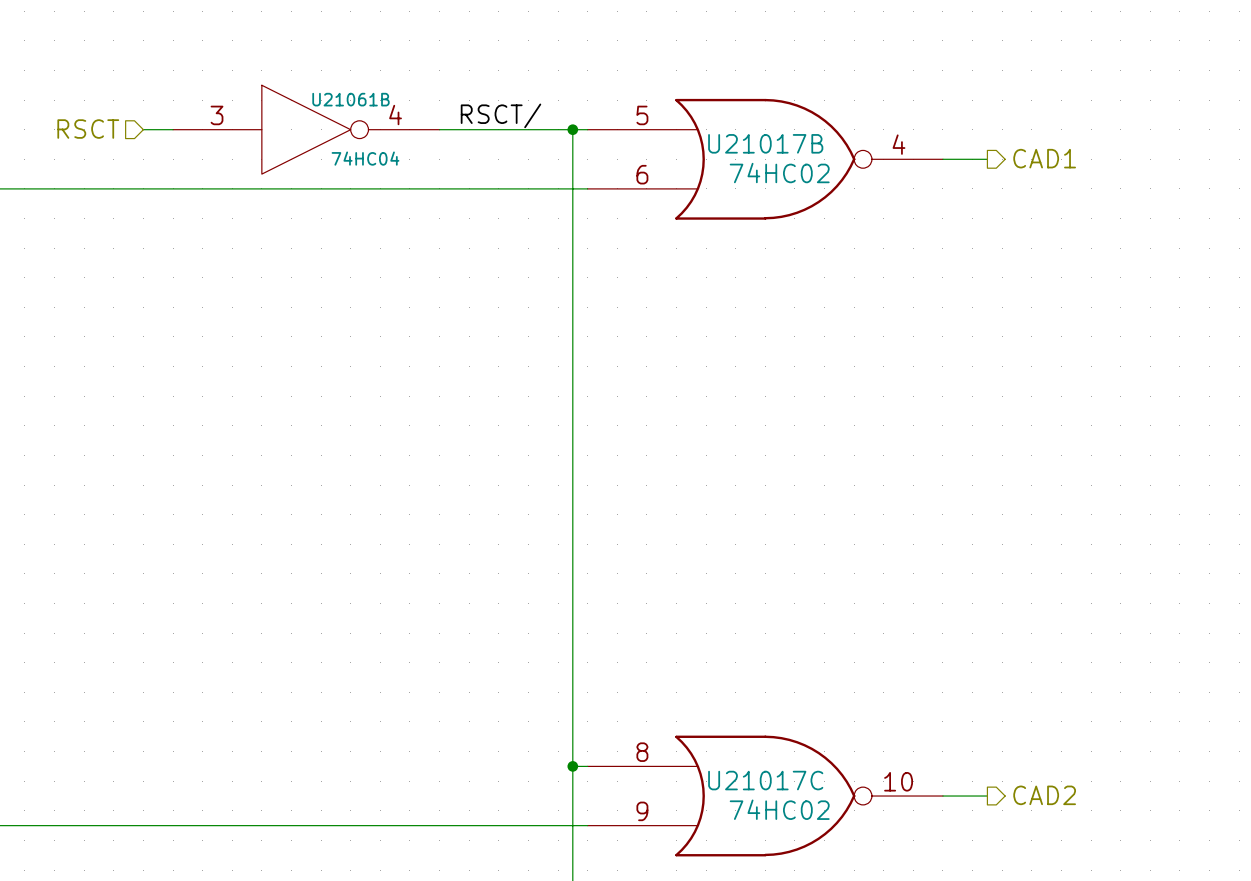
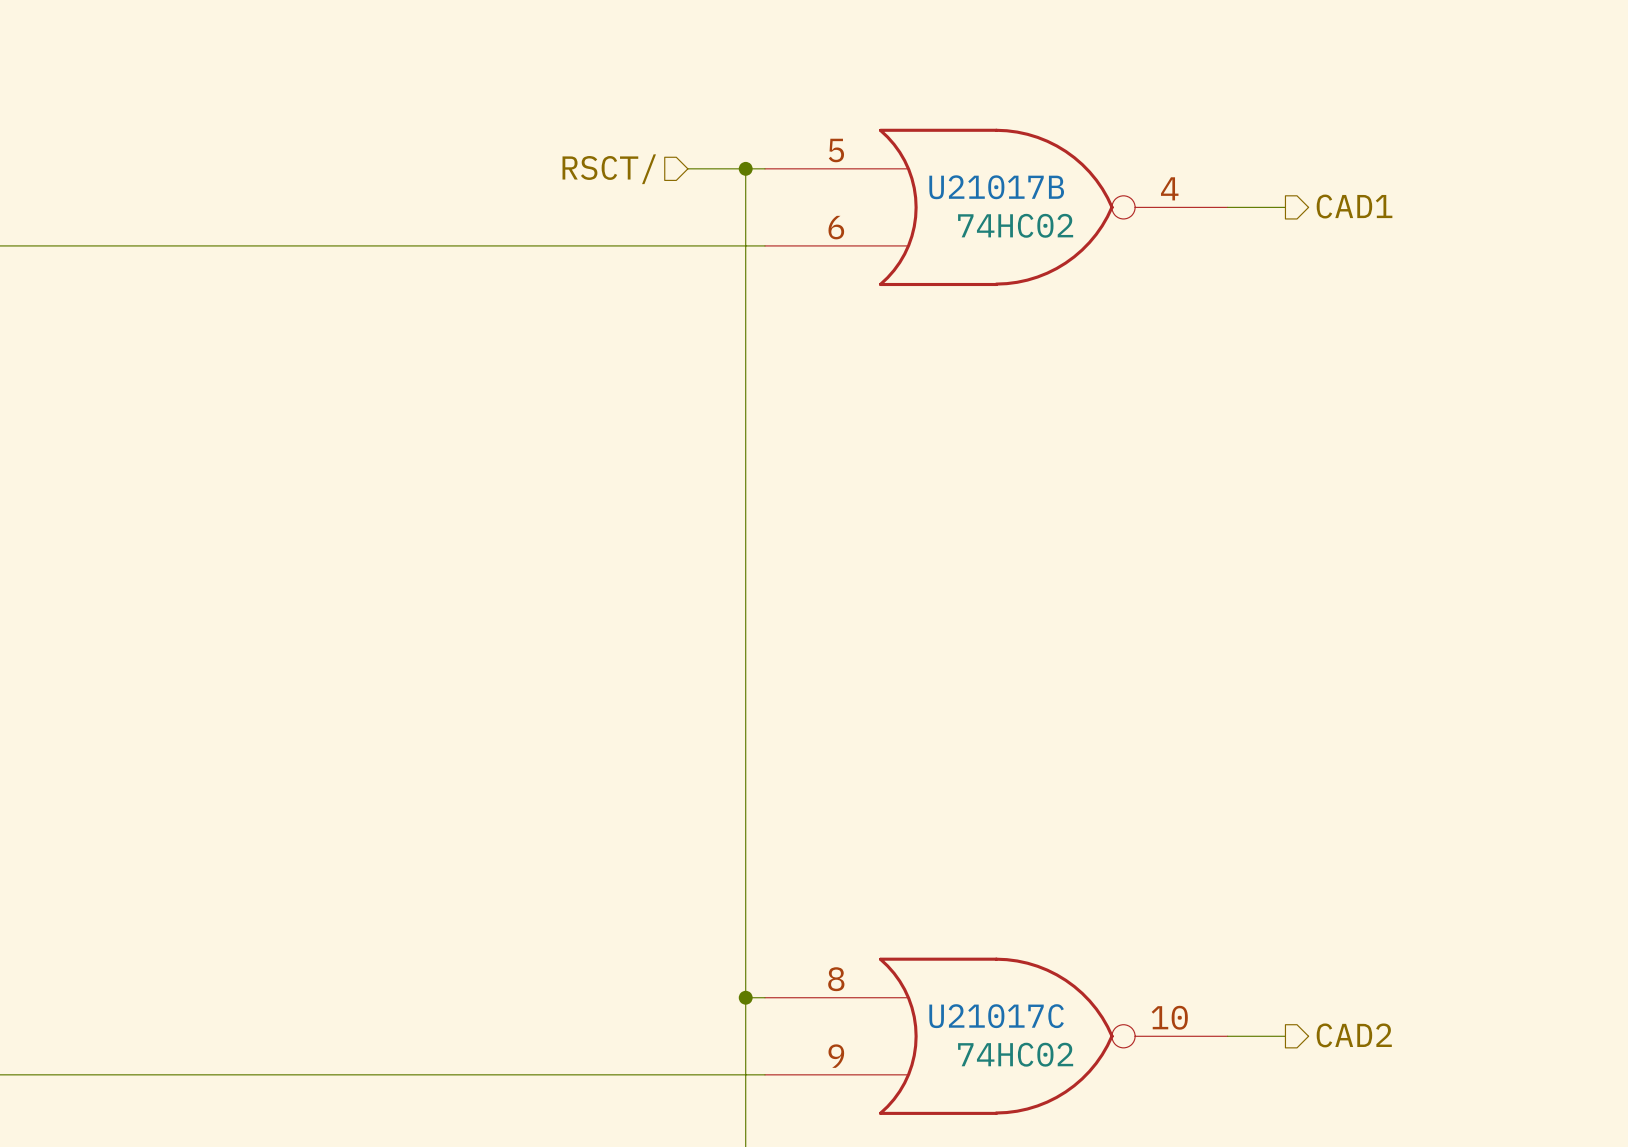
label: RSCT/ (500, 115) -> none
hierarchical label: RSCT (88, 129) -> none
wire: (143, 129) (173, 129) -> none
U21061B: 74HC04 (306, 129) -> none
wire: (439, 129) (528, 129) -> none
hierarchical label: none -> RSCT/ (609, 169)

